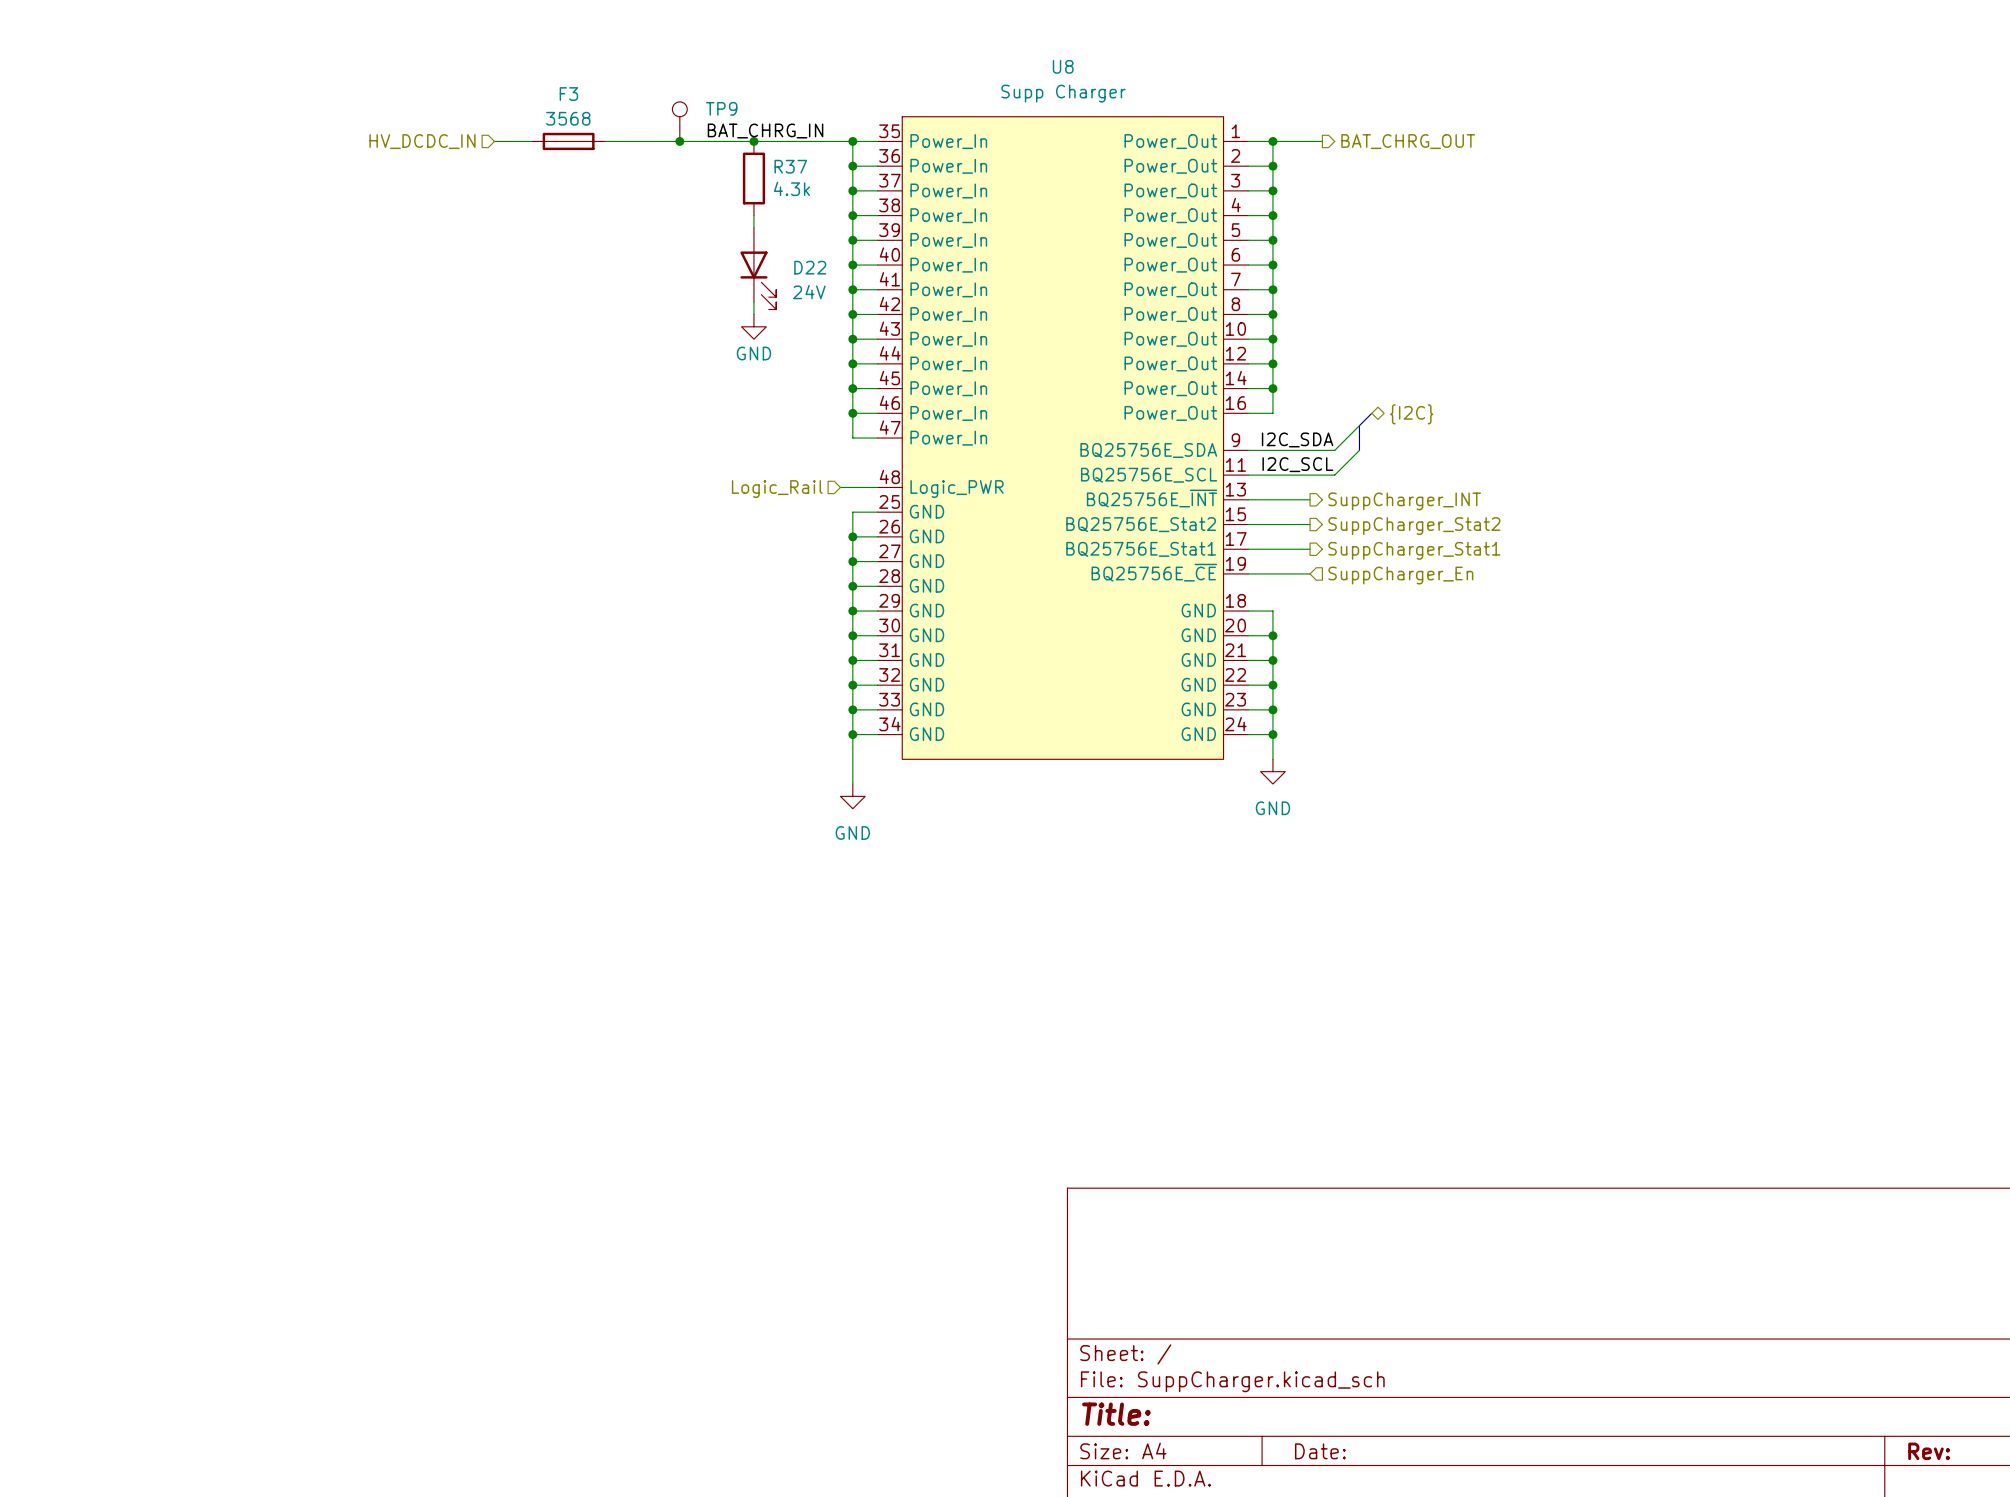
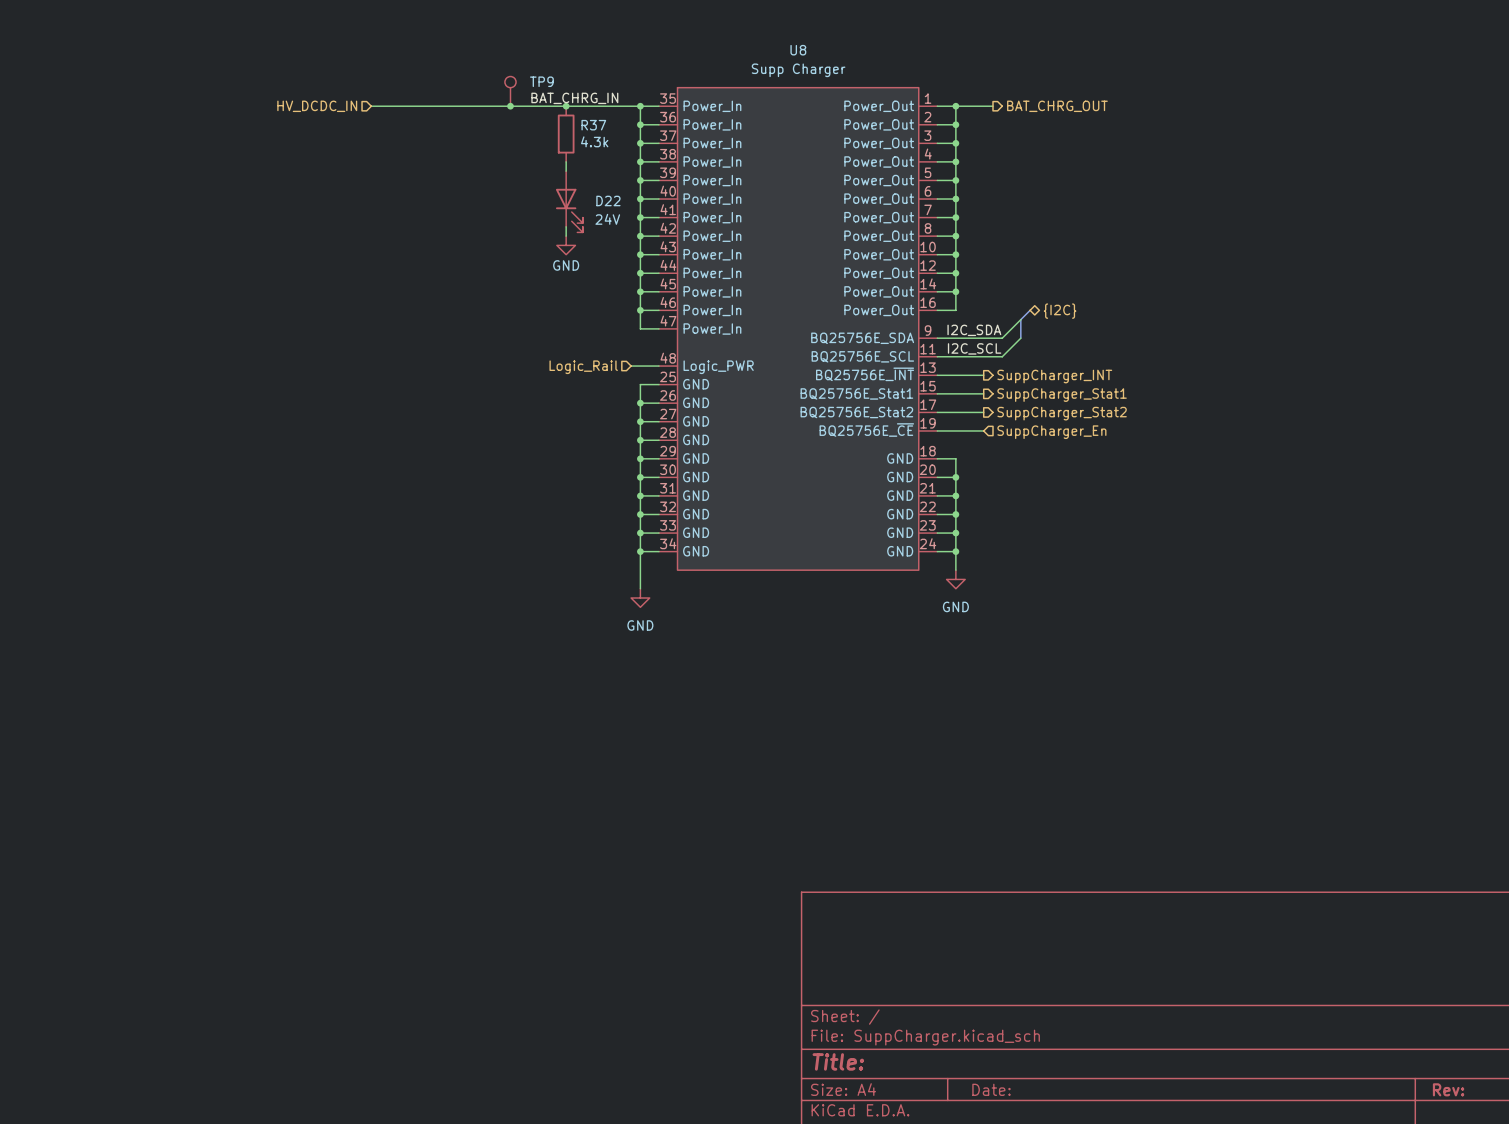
F3: 3568 (568, 141) -> none
U8 pin name: BQ25756E_Stat2 (1141, 524) -> BQ25756E_Stat1 (856, 393)
hierarchical label: SuppCharger_Stat2 (1414, 526) -> SuppCharger_Stat1 (1062, 395)
U8 pin name: BQ25756E_Stat1 (1141, 549) -> BQ25756E_Stat2 (856, 412)
hierarchical label: SuppCharger_Stat1 (1414, 550) -> SuppCharger_Stat2 (1062, 413)

